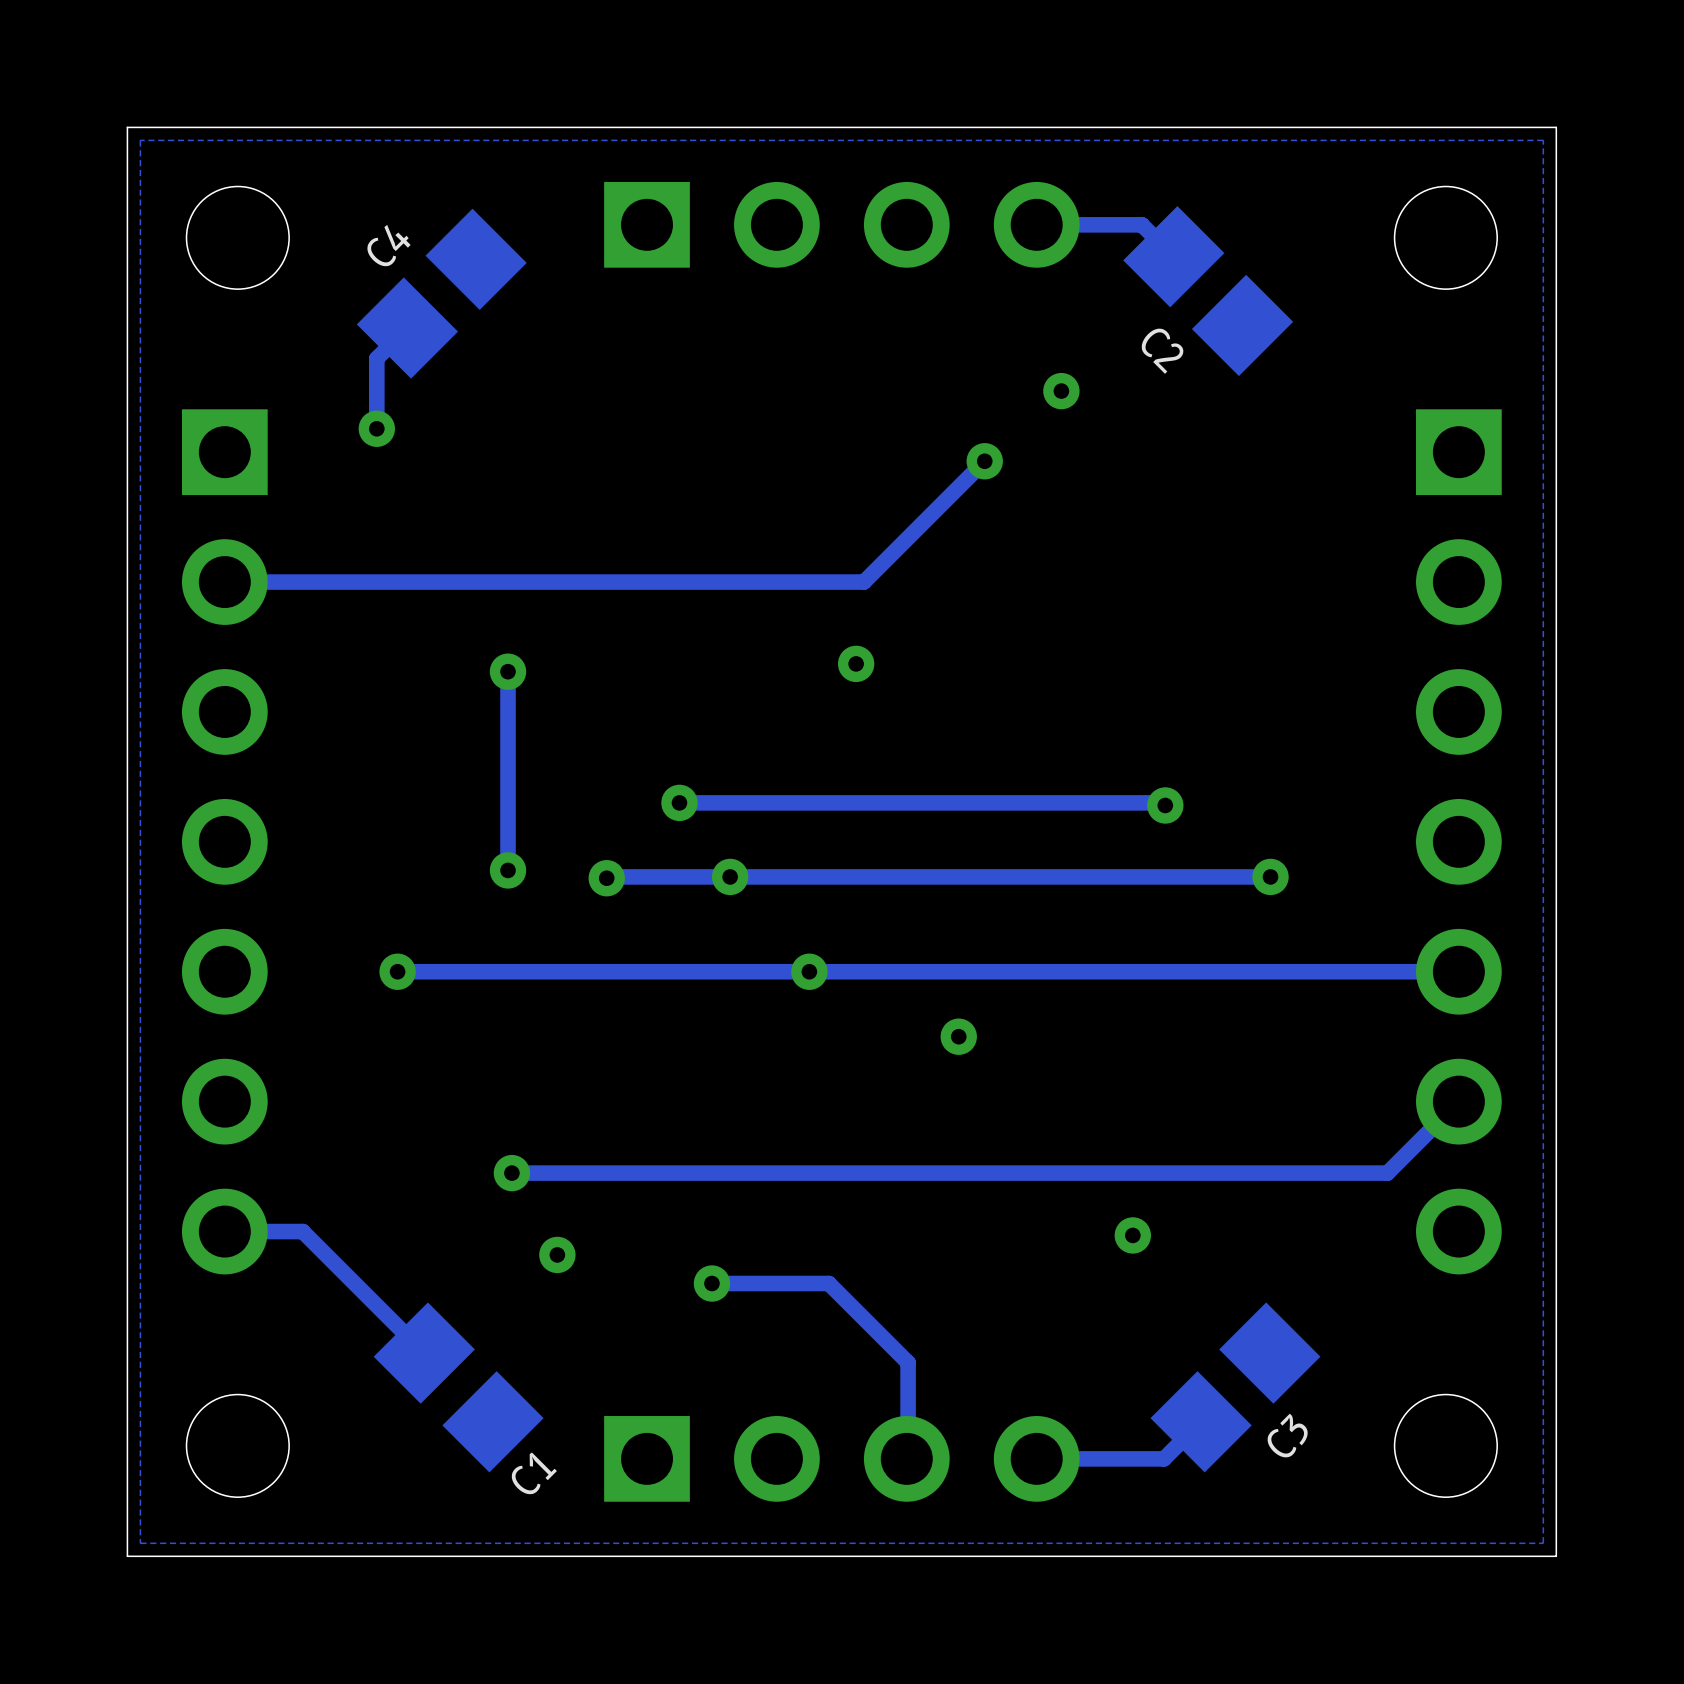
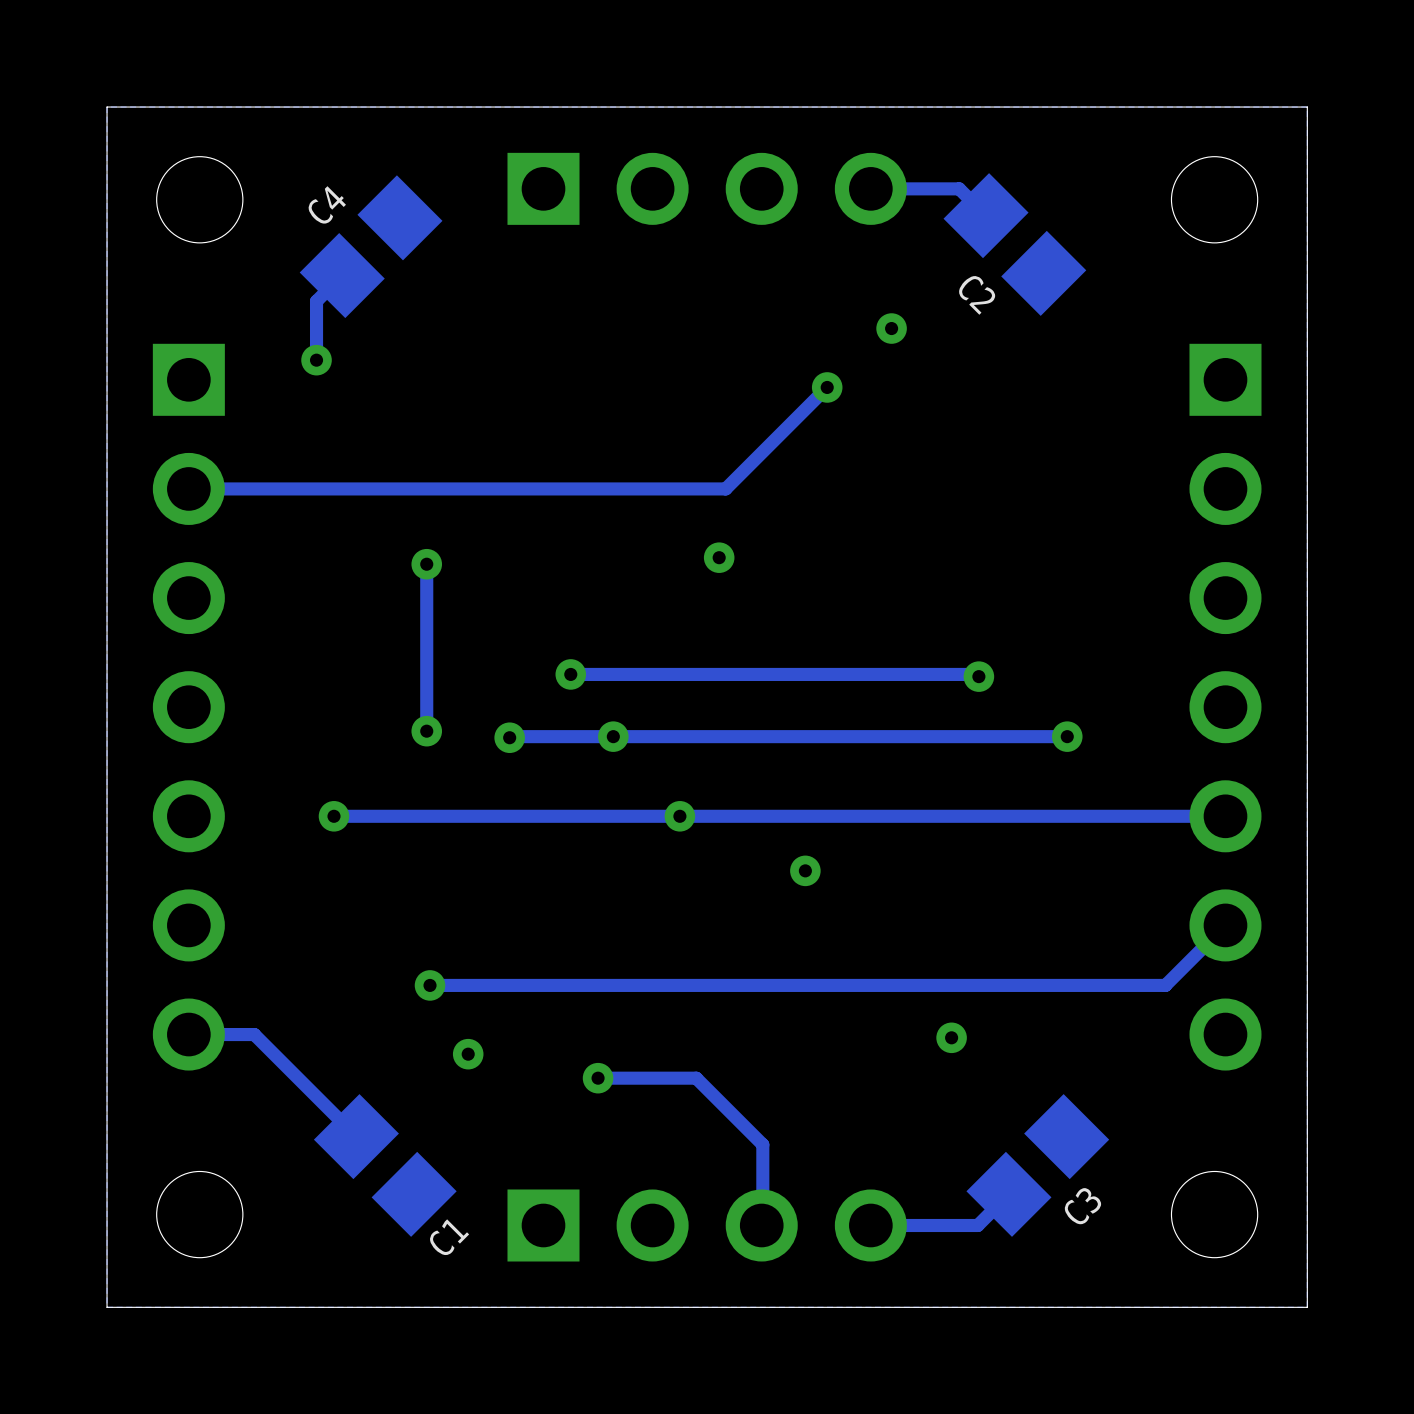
zone outline: (1543, 140) (1543, 1543) (140, 1543) (140, 140) (1543, 140) -> (1307, 107) (1307, 1307) (107, 1307) (107, 107) (1307, 107)

